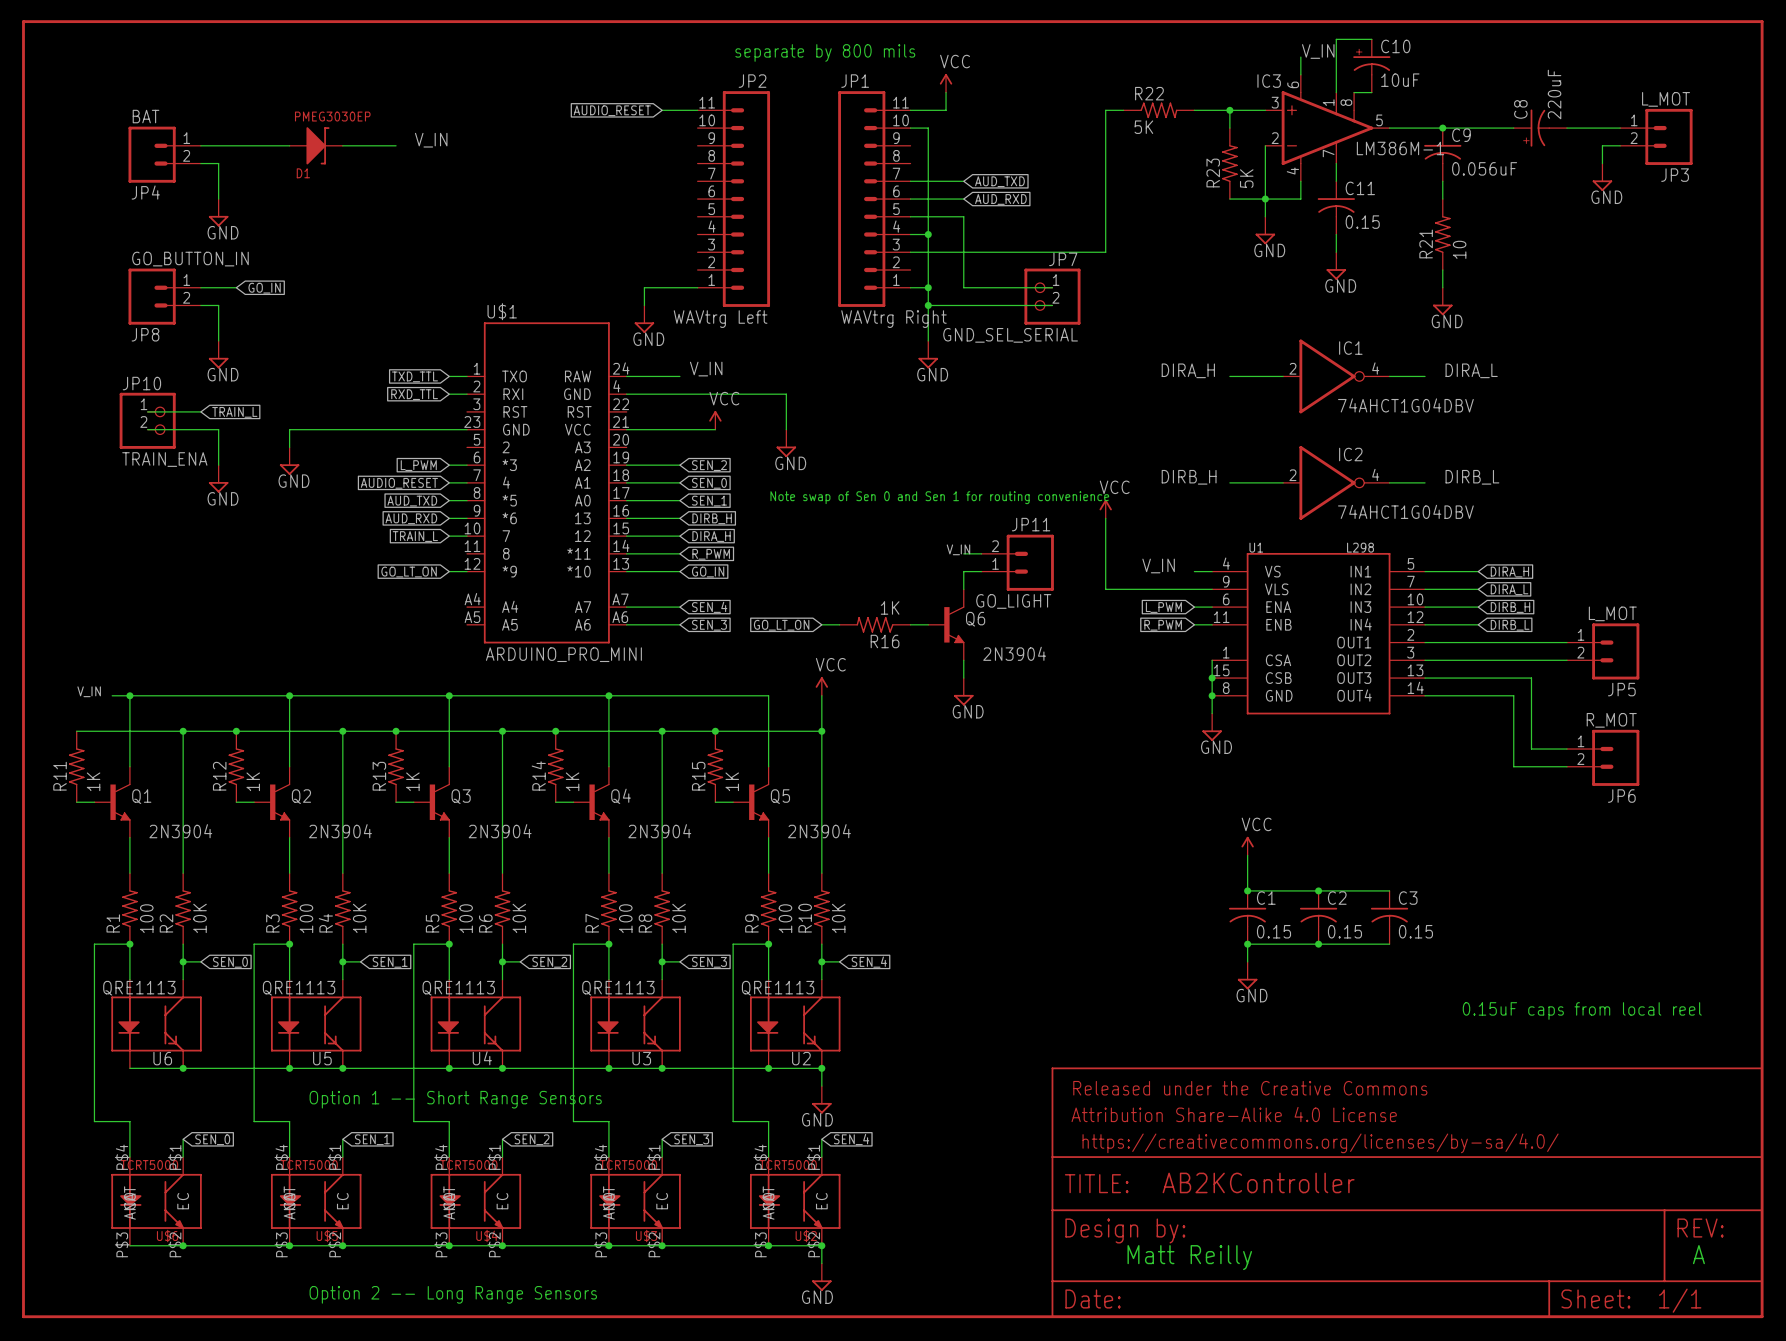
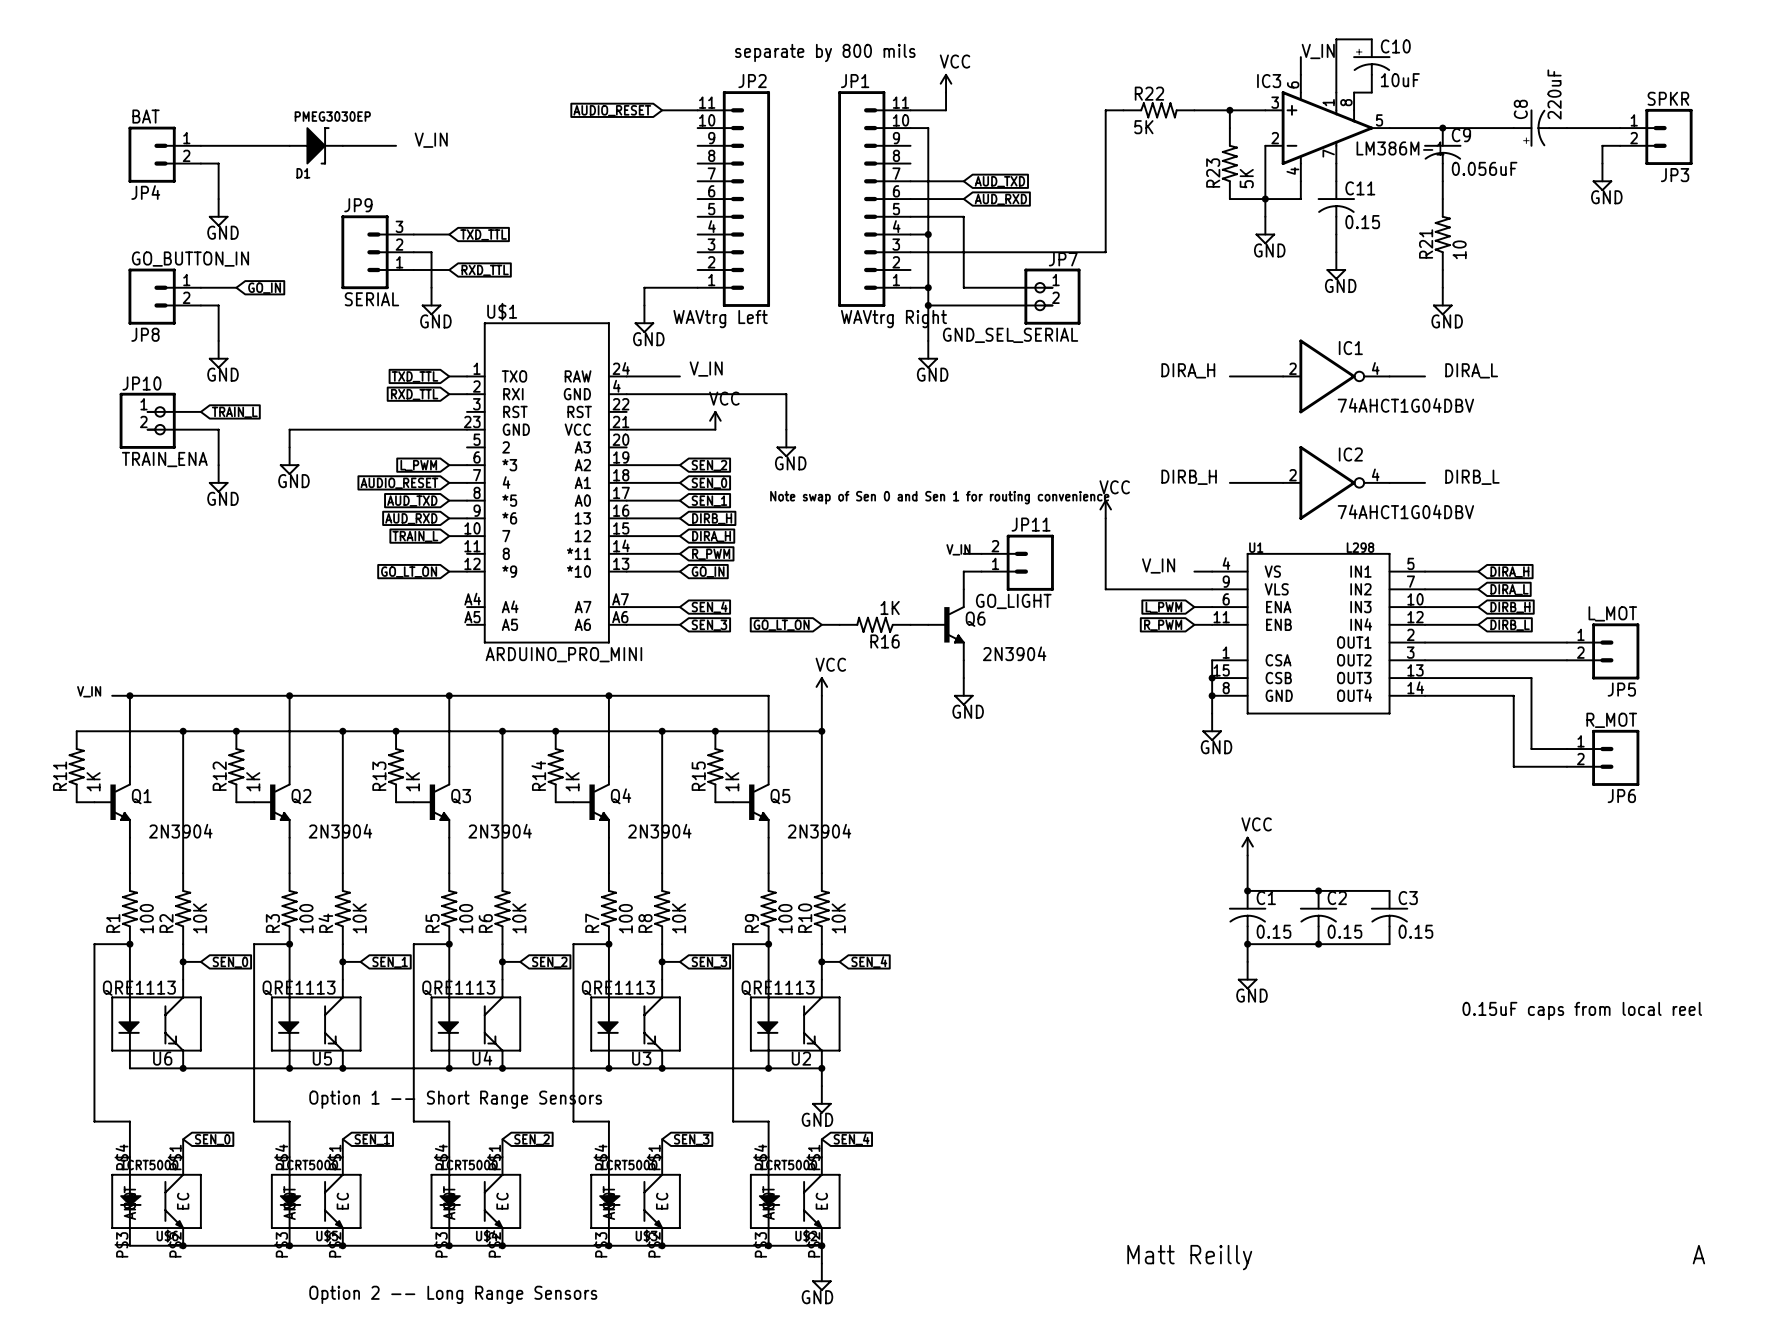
JP3 value: L_MOT (1666, 99) -> SPKR (1668, 98)
wire: none -> (413, 234) (449, 234)
global label: none -> TXD_TTL (483, 234)
JP9: none -> SERIAL (377, 252)
wire: none -> (413, 252) (431, 252) (431, 287)
wire: none -> (413, 270) (449, 270)
global label: none -> RXD_TTL (485, 270)
power symbol: none -> GND (431, 301)
part: (892, 669) -> none
part: (1407, 1192) -> none

